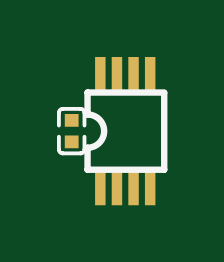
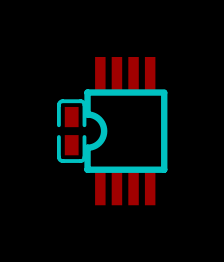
part footprint: [56, 106, 87, 156] -> [56, 99, 87, 163]

